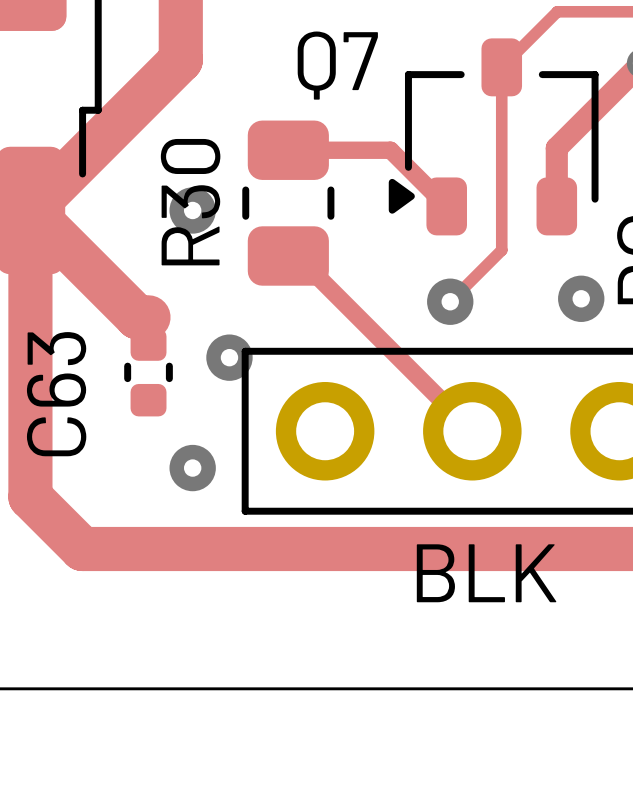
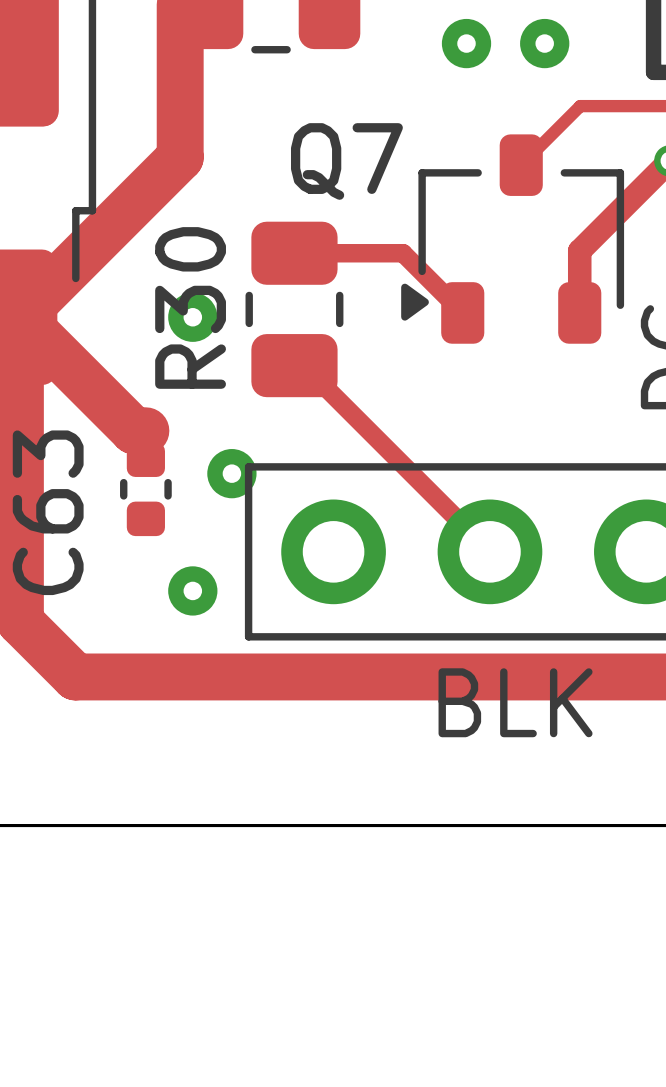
track: (501, 67) (501, 250) (450, 301) -> none
via: (581, 298) -> none
via: (450, 301) -> none

